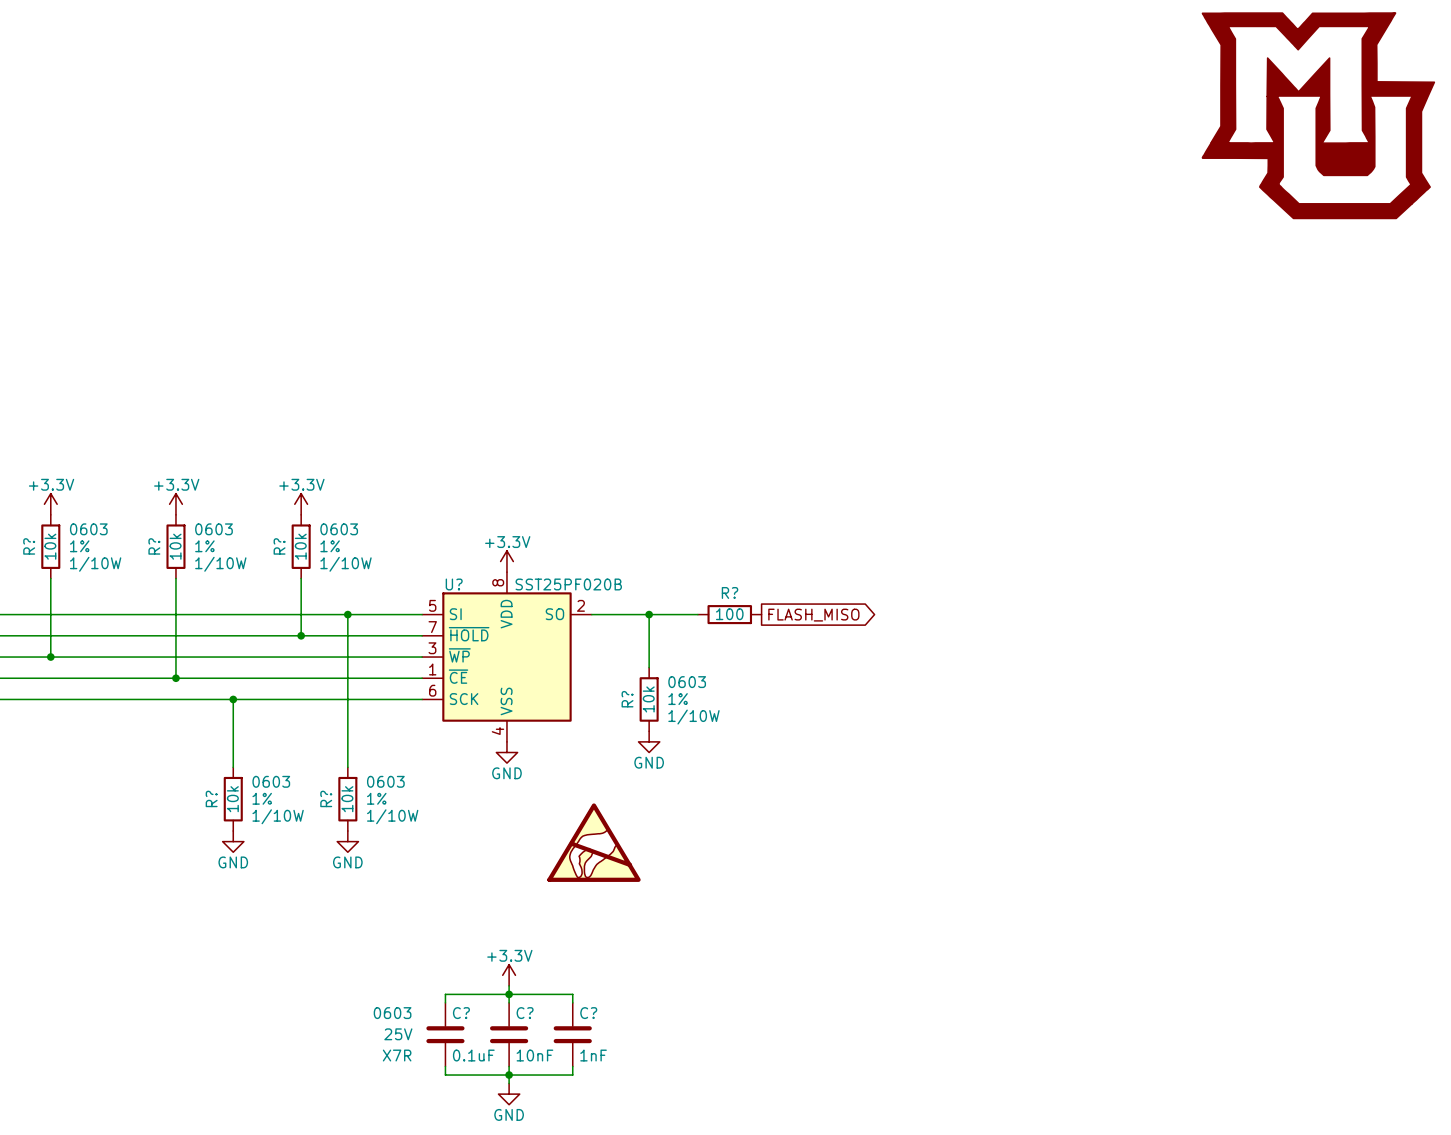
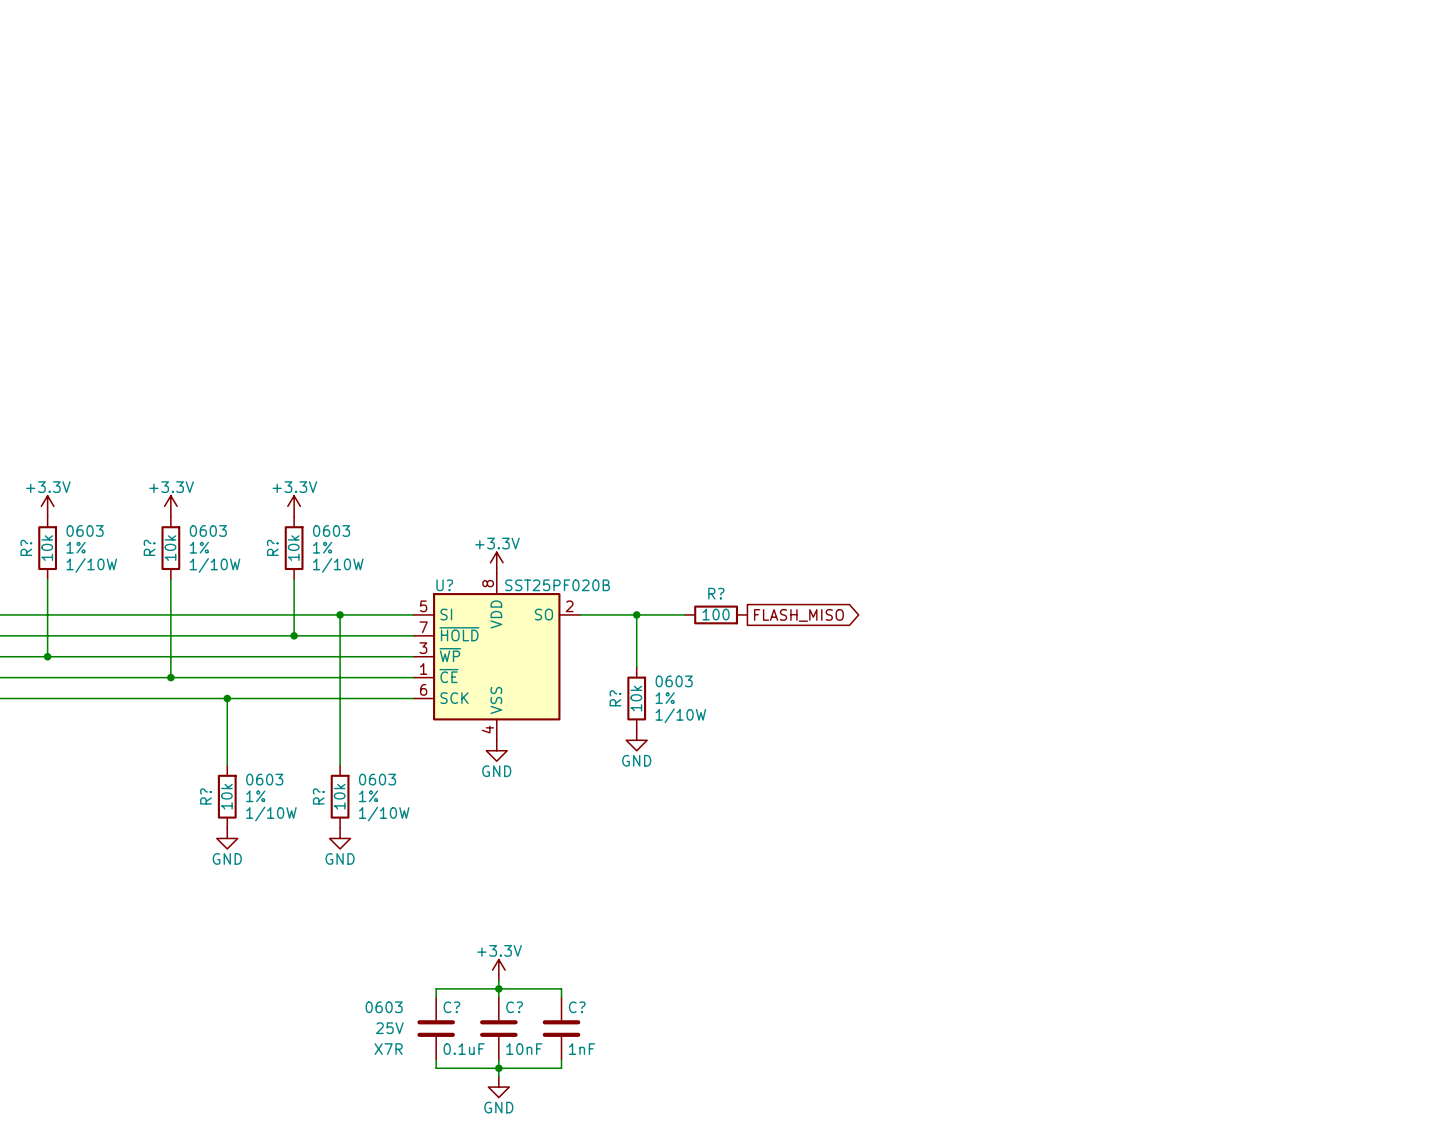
power symbol: (1318, 115) -> none
power symbol: (593, 842) -> none

